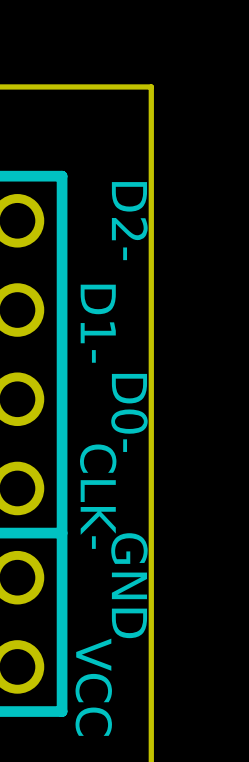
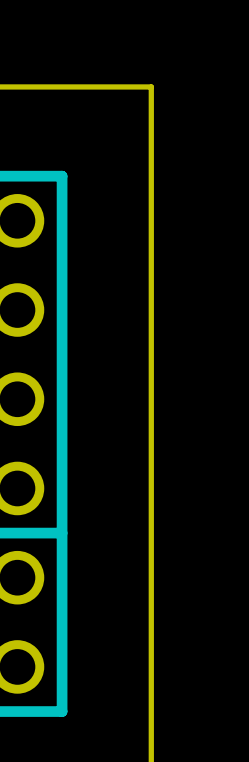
text: D2- (129, 221) -> none
text: D1- (98, 323) -> none
text: D0- (129, 412) -> none
text: CLK- (98, 496) -> none
text: GND (129, 585) -> none
text: VCC (93, 687) -> none

